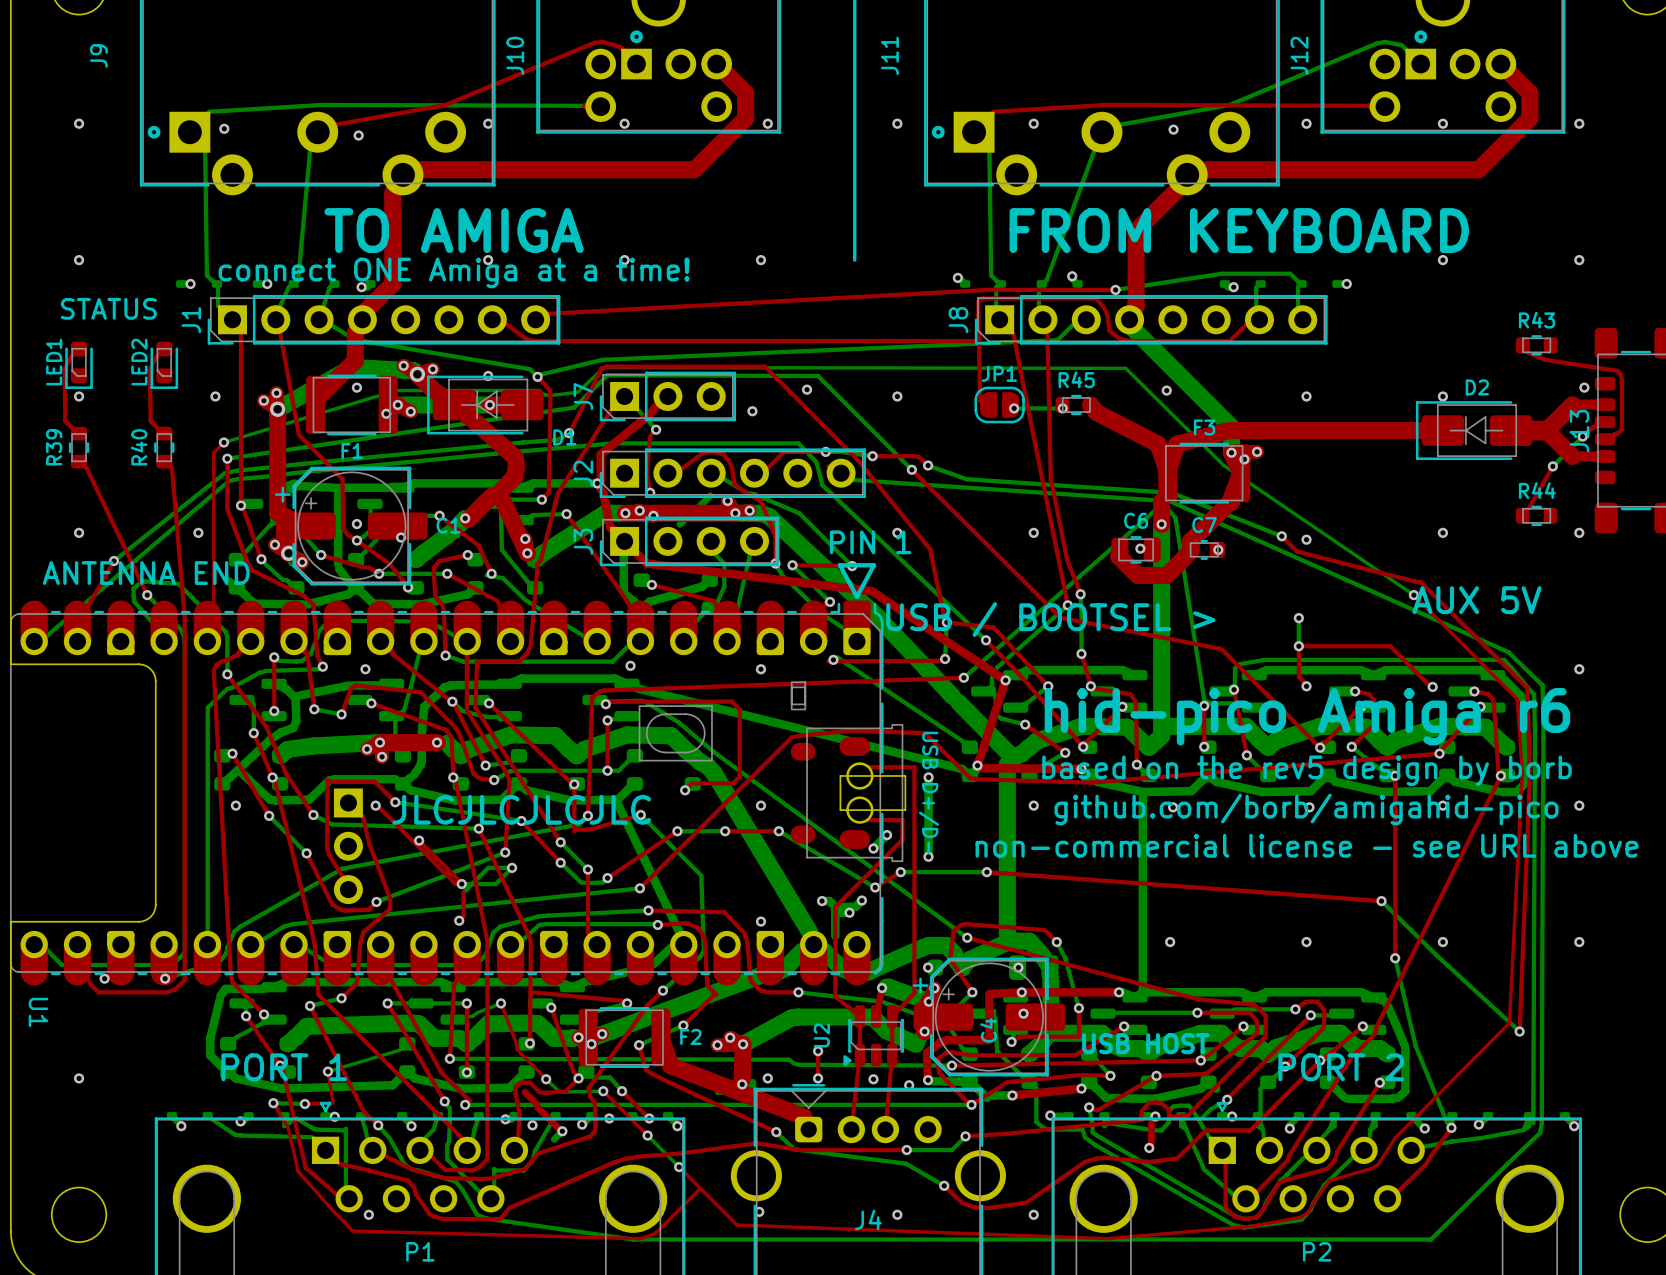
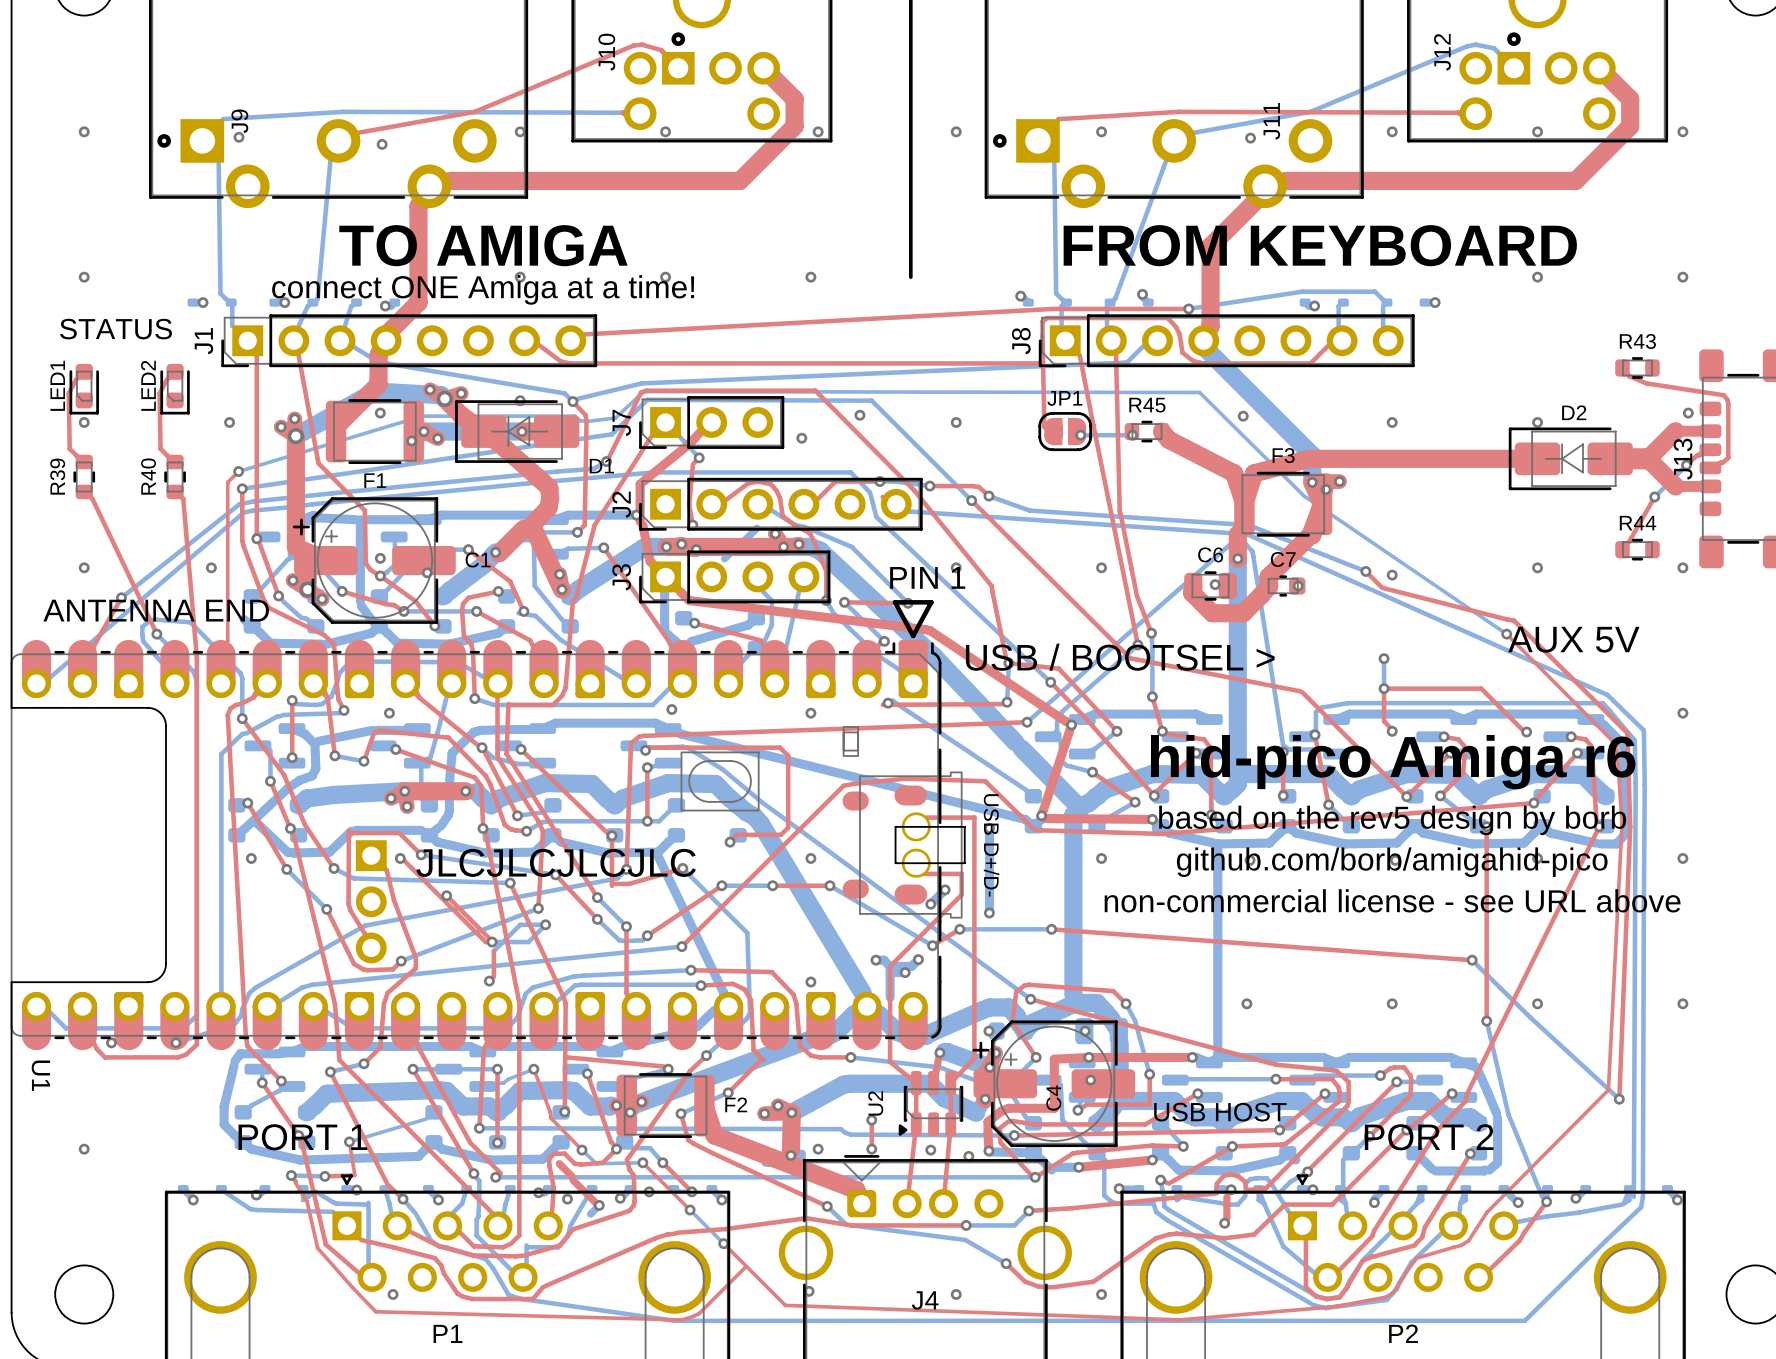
J9 name position: J9 (98, 55) -> J9 (239, 121)
J10 name position: J10 (515, 55) -> J10 (606, 52)
J11 name position: J11 (889, 55) -> J11 (1271, 121)
J12 name position: J12 (1299, 55) -> J12 (1442, 52)

